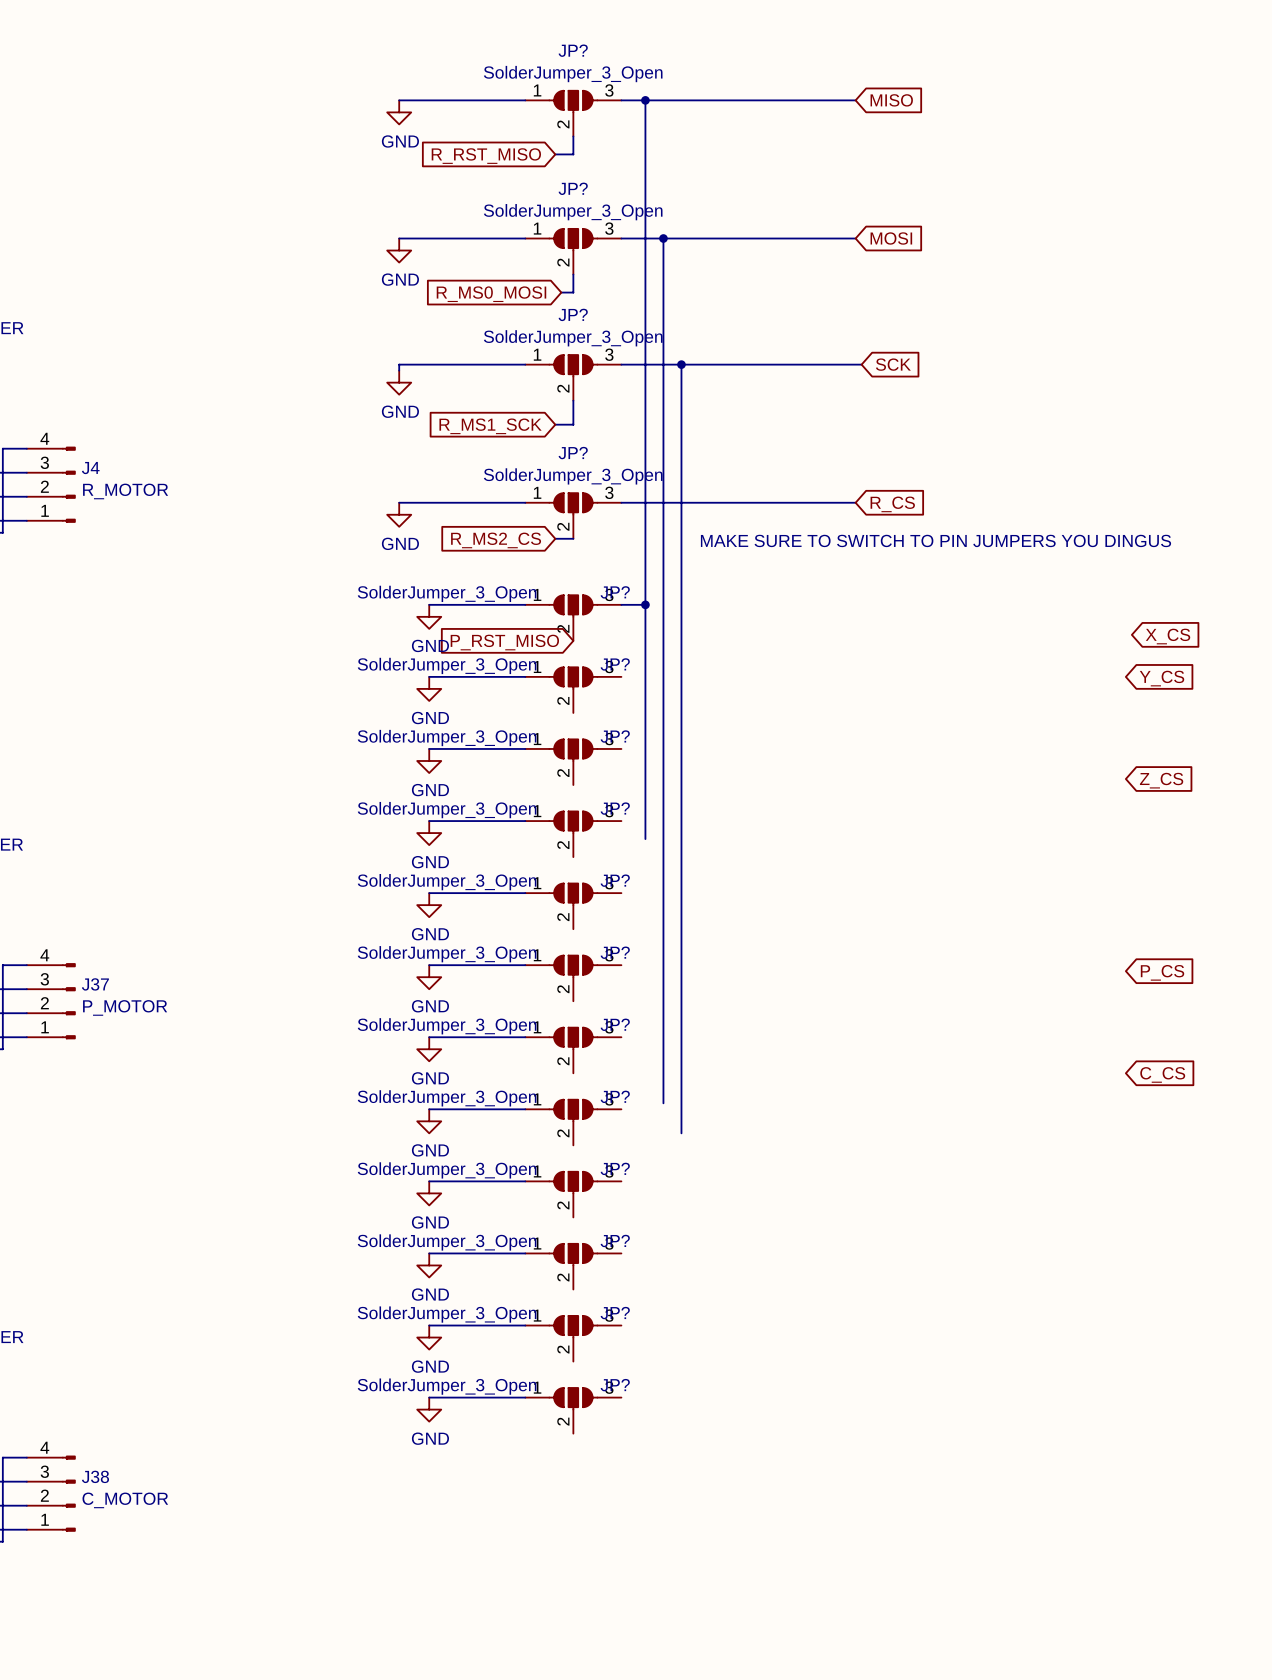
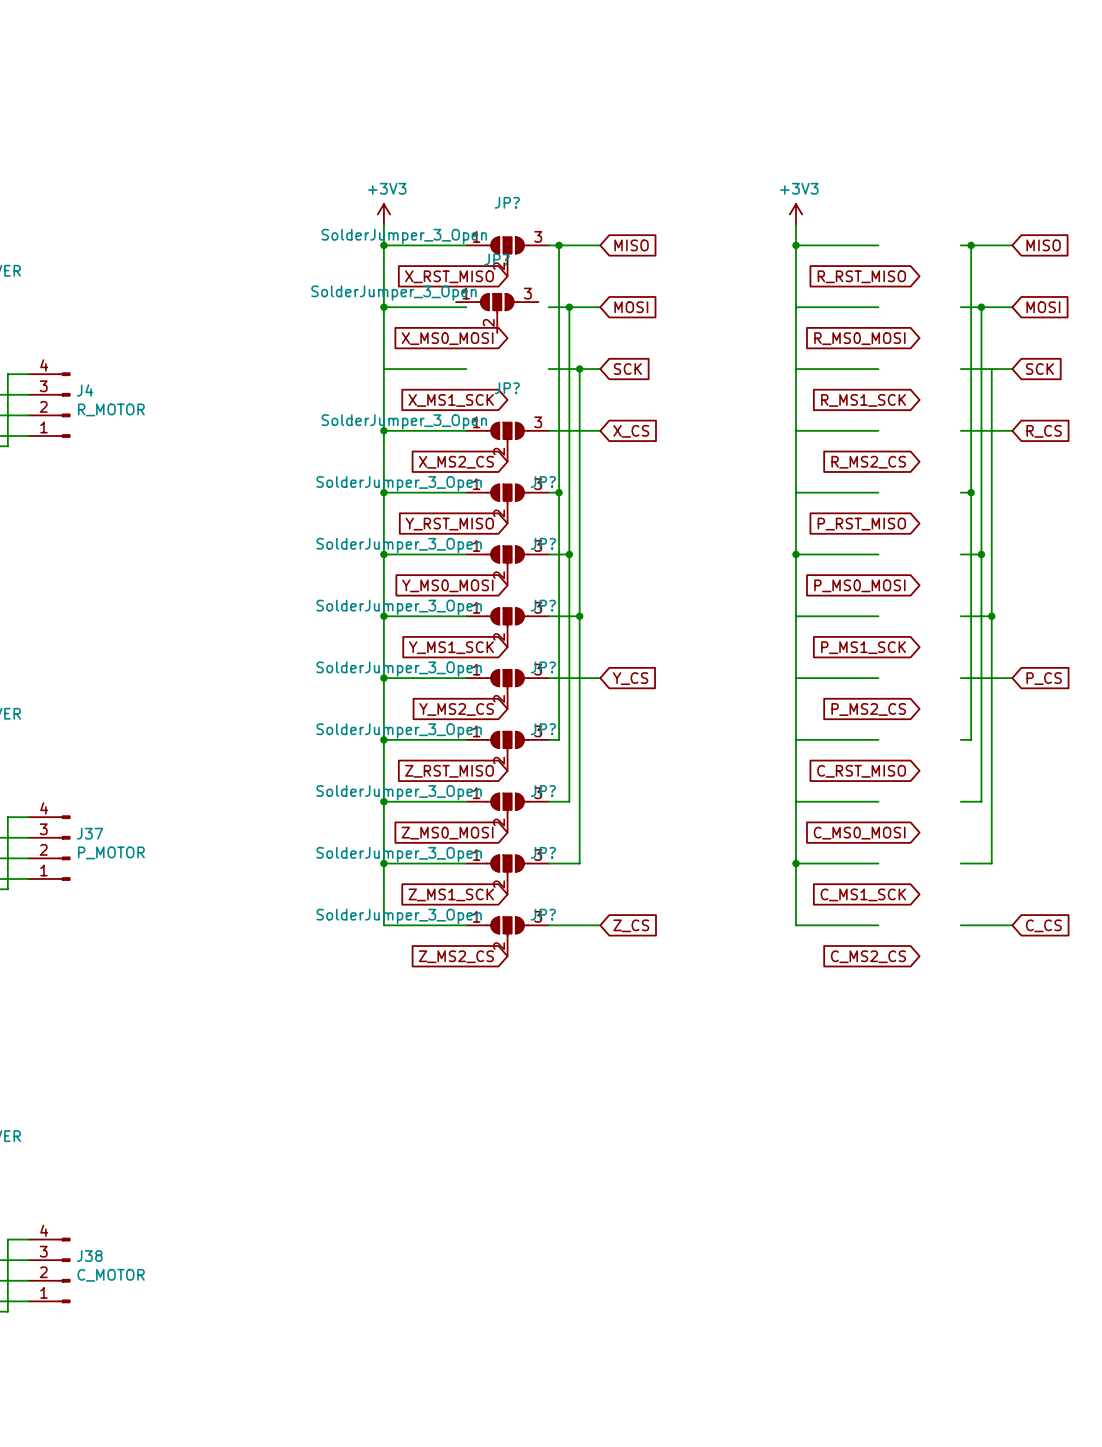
wire: (399, 100) (525, 100) -> none
wire: (621, 100) (855, 100) -> none
wire: (645, 100) (645, 298) -> none
junction: (645, 100) -> none
global label: MISO (891, 100) -> none
power symbol: GND (399, 112) -> none
JP?: SolderJumper_3_Open (573, 113) -> none
wire: (573, 136) (573, 154) (555, 154) -> none
global label: R_RST_MISO (486, 156) -> none
JP? value position: SolderJumper_3_Open (573, 212) -> SolderJumper_3_Open (404, 236)
wire: (399, 238) (525, 238) -> none
wire: (621, 238) (855, 238) -> none
wire: (663, 238) (663, 1103) -> none
junction: (663, 238) -> none
global label: MOSI (891, 238) -> none
power symbol: GND (399, 250) -> none
JP? position: (573, 251) -> (507, 256)
power symbol: none -> +3V3 (383, 214)
power symbol: none -> +3V3 (796, 214)
wire: none -> (383, 224) (383, 925) (466, 925)
wire: (573, 274) (573, 292) (561, 292) -> none
wire: none -> (796, 224) (796, 925) (878, 925)
global label: R_MS0_MOSI (491, 294) -> none
wire: none -> (383, 245) (466, 245)
junction: none -> (383, 245)
wire: none -> (548, 245) (600, 245)
junction: none -> (559, 245)
global label: none -> MISO (631, 245)
wire: none -> (796, 245) (878, 245)
junction: none -> (796, 245)
wire: none -> (960, 245) (1012, 245)
wire: none -> (971, 245) (971, 739) (960, 739)
junction: none -> (971, 245)
global label: none -> MISO (1043, 245)
global label: none -> X_RST_MISO (449, 276)
global label: none -> R_RST_MISO (861, 276)
JP? value position: SolderJumper_3_Open (573, 338) -> SolderJumper_3_Open (393, 293)
wire: (525, 364) (399, 364) (399, 370) -> none
wire: (621, 364) (861, 364) -> none
wire: (681, 364) (681, 1133) -> none
junction position: (681, 364) -> (569, 307)
global label: SCK (893, 364) -> none
junction: none -> (383, 307)
wire: none -> (548, 307) (600, 307)
wire: none -> (569, 307) (569, 801) (548, 801)
global label: none -> MOSI (631, 307)
wire: none -> (796, 307) (878, 307)
wire: none -> (960, 307) (1012, 307)
wire: none -> (981, 307) (981, 801) (960, 801)
junction: none -> (981, 307)
global label: none -> MOSI (1043, 307)
power symbol: GND (399, 382) -> none
wire: (573, 400) (573, 424) (555, 424) -> none
global label: none -> X_MS0_MOSI (447, 338)
global label: none -> R_MS0_MOSI (859, 338)
global label: R_MS1_SCK (490, 426) -> none
wire: none -> (548, 369) (600, 369)
wire: none -> (579, 369) (579, 863) (548, 863)
junction: none -> (579, 369)
global label: none -> SCK (627, 369)
wire: none -> (796, 369) (878, 369)
wire: none -> (960, 369) (1012, 369)
wire: none -> (991, 369) (991, 863) (960, 863)
global label: none -> SCK (1039, 369)
JP? value position: SolderJumper_3_Open (573, 476) -> SolderJumper_3_Open (404, 421)
global label: none -> X_MS1_SCK (451, 400)
global label: none -> R_MS1_SCK (863, 400)
wire: (399, 502) (525, 502) -> none
wire: (621, 502) (855, 502) -> none
global label: R_CS (892, 504) -> none
power symbol: GND (399, 514) -> none
junction: none -> (383, 430)
wire: none -> (548, 430) (600, 430)
wire: none -> (796, 430) (878, 430)
wire: none -> (960, 430) (1012, 430)
JP? position: (573, 515) -> (507, 442)
global label: none -> X_CS (631, 431)
global label: none -> R_CS (1044, 431)
global label: R_MS2_CS (496, 540) -> X_MS2_CS (456, 462)
text: MAKE SURE TO SWITCH TO PIN JUMPERS YOU DINGUS (935, 540) -> none
global label: none -> R_MS2_CS (868, 462)
junction: none -> (383, 492)
wire: none -> (548, 492) (559, 492)
wire: none -> (796, 492) (878, 492)
wire: none -> (960, 492) (971, 492)
junction: none -> (971, 492)
wire: (429, 604) (525, 604) -> (383, 307) (466, 307)
wire: (621, 604) (645, 604) -> (548, 554) (569, 554)
junction position: (645, 604) -> (559, 492)
power symbol: GND (429, 616) -> none
JP? position: (573, 618) -> (507, 503)
global label: none -> P_RST_MISO (861, 524)
global label: X_CS (1167, 636) -> none
global label: P_RST_MISO (504, 642) -> Y_RST_MISO (449, 524)
junction: none -> (383, 554)
junction: none -> (569, 554)
wire: none -> (796, 554) (878, 554)
junction: none -> (796, 554)
wire: none -> (960, 554) (981, 554)
junction: none -> (981, 554)
wire: (429, 676) (525, 676) -> (383, 369) (466, 369)
global label: Y_CS (1161, 678) -> none
power symbol: GND (429, 688) -> none
JP? position: (573, 690) -> (507, 565)
global label: none -> Y_MS0_MOSI (447, 585)
global label: none -> P_MS0_MOSI (859, 585)
junction: none -> (383, 616)
wire: none -> (548, 616) (579, 616)
junction: none -> (579, 616)
wire: none -> (796, 616) (878, 616)
wire: none -> (960, 616) (991, 616)
junction: none -> (991, 616)
wire: (429, 748) (525, 748) -> (383, 430) (466, 430)
power symbol: GND (429, 760) -> none
JP? position: (573, 762) -> (507, 627)
global label: none -> Y_MS1_SCK (451, 647)
global label: none -> P_MS1_SCK (863, 647)
global label: Z_CS (1161, 780) -> none
junction: none -> (383, 678)
wire: none -> (548, 678) (600, 678)
wire: none -> (796, 678) (878, 678)
wire: none -> (960, 678) (1012, 678)
global label: none -> Y_CS (630, 678)
wire: (429, 821) (525, 821) -> (383, 492) (466, 492)
power symbol: GND (429, 833) -> none
JP? position: (573, 834) -> (507, 689)
wire: none -> (559, 709) (559, 739) (548, 739)
global label: none -> Y_MS2_CS (456, 709)
global label: none -> P_MS2_CS (868, 709)
junction: none -> (383, 739)
wire: none -> (796, 739) (878, 739)
wire: (429, 893) (525, 893) -> (383, 554) (466, 554)
power symbol: GND (429, 905) -> none
JP? position: (573, 906) -> (507, 751)
global label: none -> Z_RST_MISO (449, 771)
global label: none -> C_RST_MISO (861, 771)
junction: none -> (383, 801)
wire: none -> (796, 801) (878, 801)
wire: (429, 965) (525, 965) -> (383, 616) (466, 616)
global label position: P_CS (1162, 972) -> P_CS (1044, 678)
power symbol: GND (429, 977) -> none
JP? position: (573, 978) -> (507, 813)
global label: none -> Z_MS0_MOSI (447, 833)
global label: none -> C_MS0_MOSI (859, 833)
junction: none -> (383, 863)
wire: none -> (796, 863) (878, 863)
junction: none -> (796, 863)
wire: (429, 1037) (525, 1037) -> (383, 678) (466, 678)
power symbol: GND (429, 1049) -> none
JP? position: (573, 1050) -> (507, 874)
global label: none -> Z_MS1_SCK (451, 894)
global label: none -> C_MS1_SCK (863, 894)
global label position: C_CS (1162, 1074) -> C_CS (1043, 925)
wire: none -> (548, 925) (600, 925)
wire: none -> (960, 925) (1012, 925)
global label: none -> Z_CS (631, 925)
wire: (429, 1109) (525, 1109) -> (383, 739) (466, 739)
power symbol: GND (429, 1121) -> none
JP? position: (573, 1122) -> (507, 936)
global label: none -> Z_MS2_CS (456, 956)
global label: none -> C_MS2_CS (868, 956)
wire: (429, 1181) (525, 1181) -> (383, 801) (466, 801)
power symbol: GND (429, 1193) -> none
JP?: SolderJumper_3_Open (573, 1194) -> none
wire: (429, 1253) (525, 1253) -> (383, 863) (466, 863)
power symbol: GND (429, 1265) -> none
JP?: SolderJumper_3_Open (573, 1266) -> none
wire: (429, 1325) (525, 1325) -> none
power symbol: GND (429, 1337) -> none
JP?: SolderJumper_3_Open (573, 1338) -> none
wire: (429, 1397) (525, 1397) -> none
power symbol: GND (429, 1409) -> none
JP?: SolderJumper_3_Open (573, 1410) -> none

